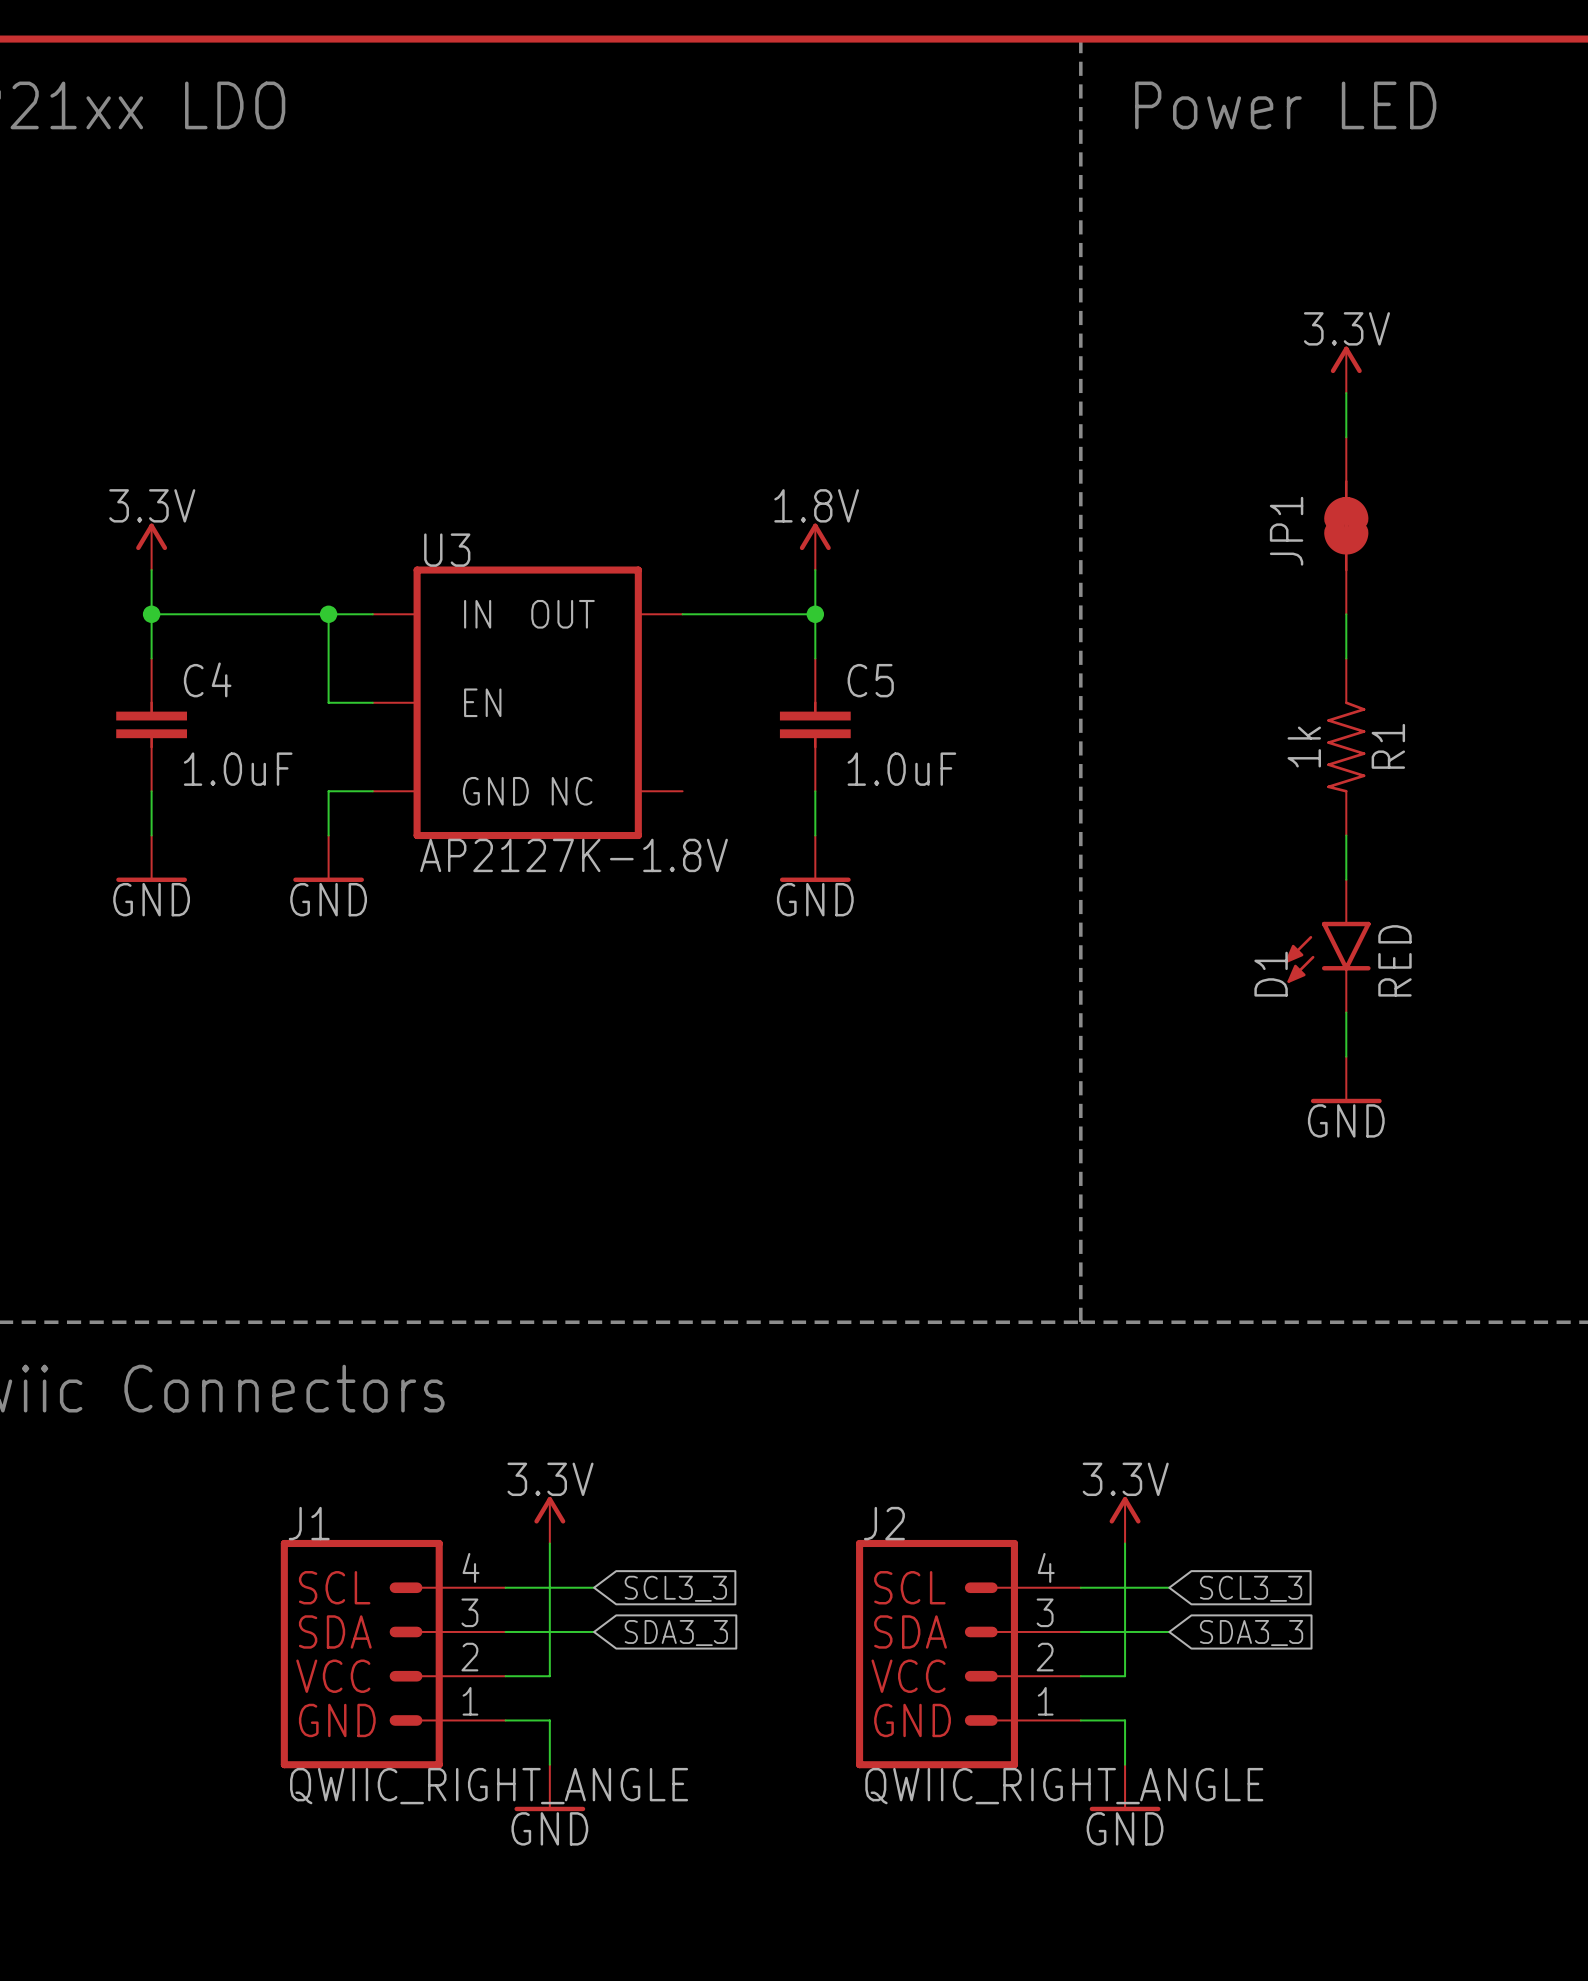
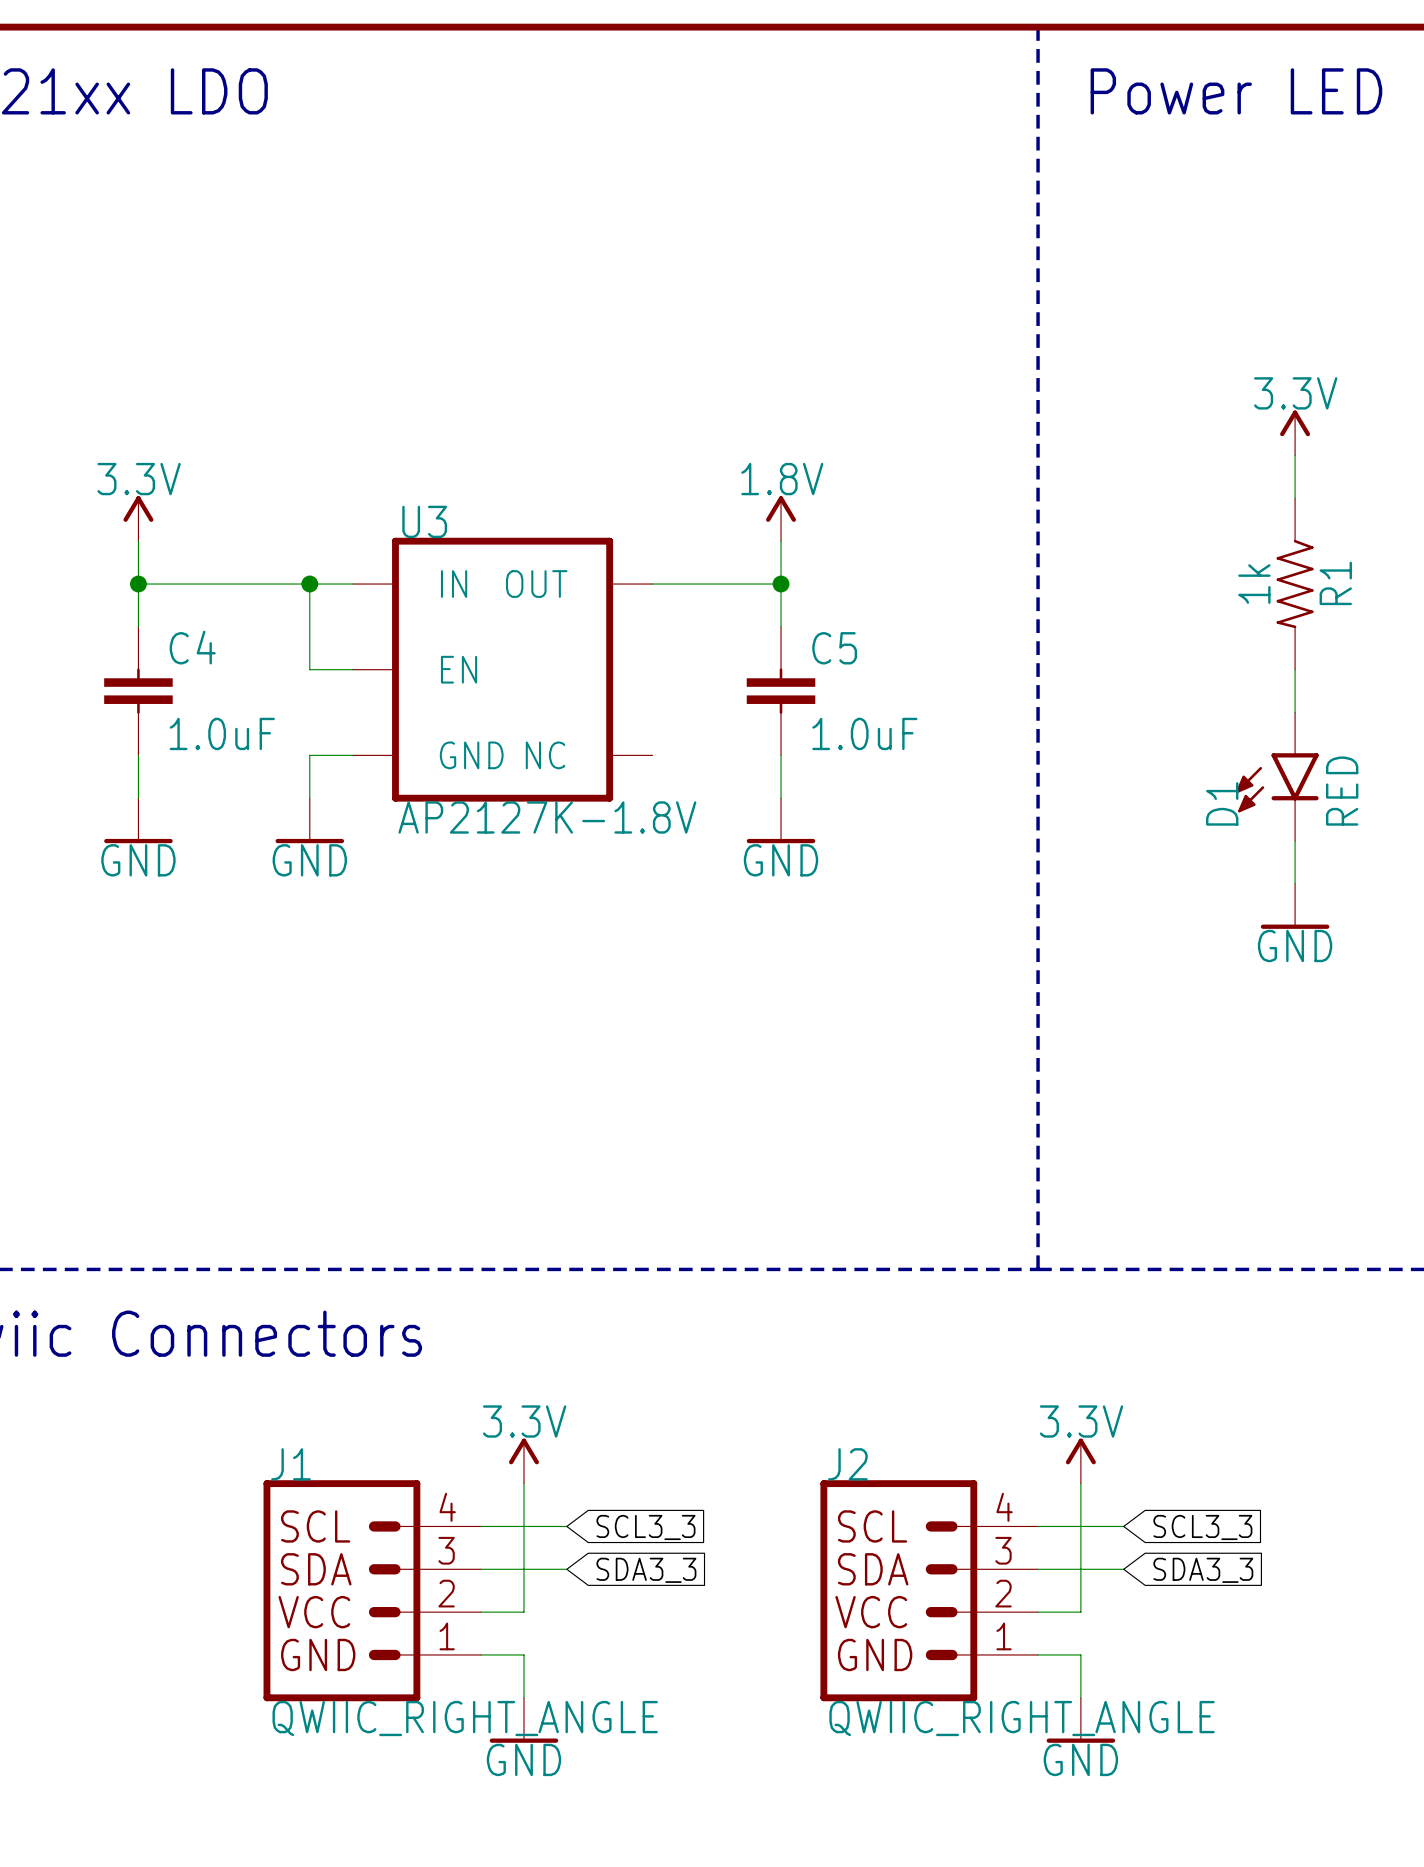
power symbol position: 3.3V (1346, 369) -> 3.3V (1295, 433)
wire: (1346, 393) (1346, 437) -> (1295, 669) (1295, 712)
JP1: (1346, 525) -> none
R1 position: (1346, 747) -> (1295, 584)
D1 position: (1327, 946) -> (1277, 776)
wire: (1346, 1012) (1346, 1056) -> none
power symbol position: GND (1346, 1079) -> GND (1295, 906)

